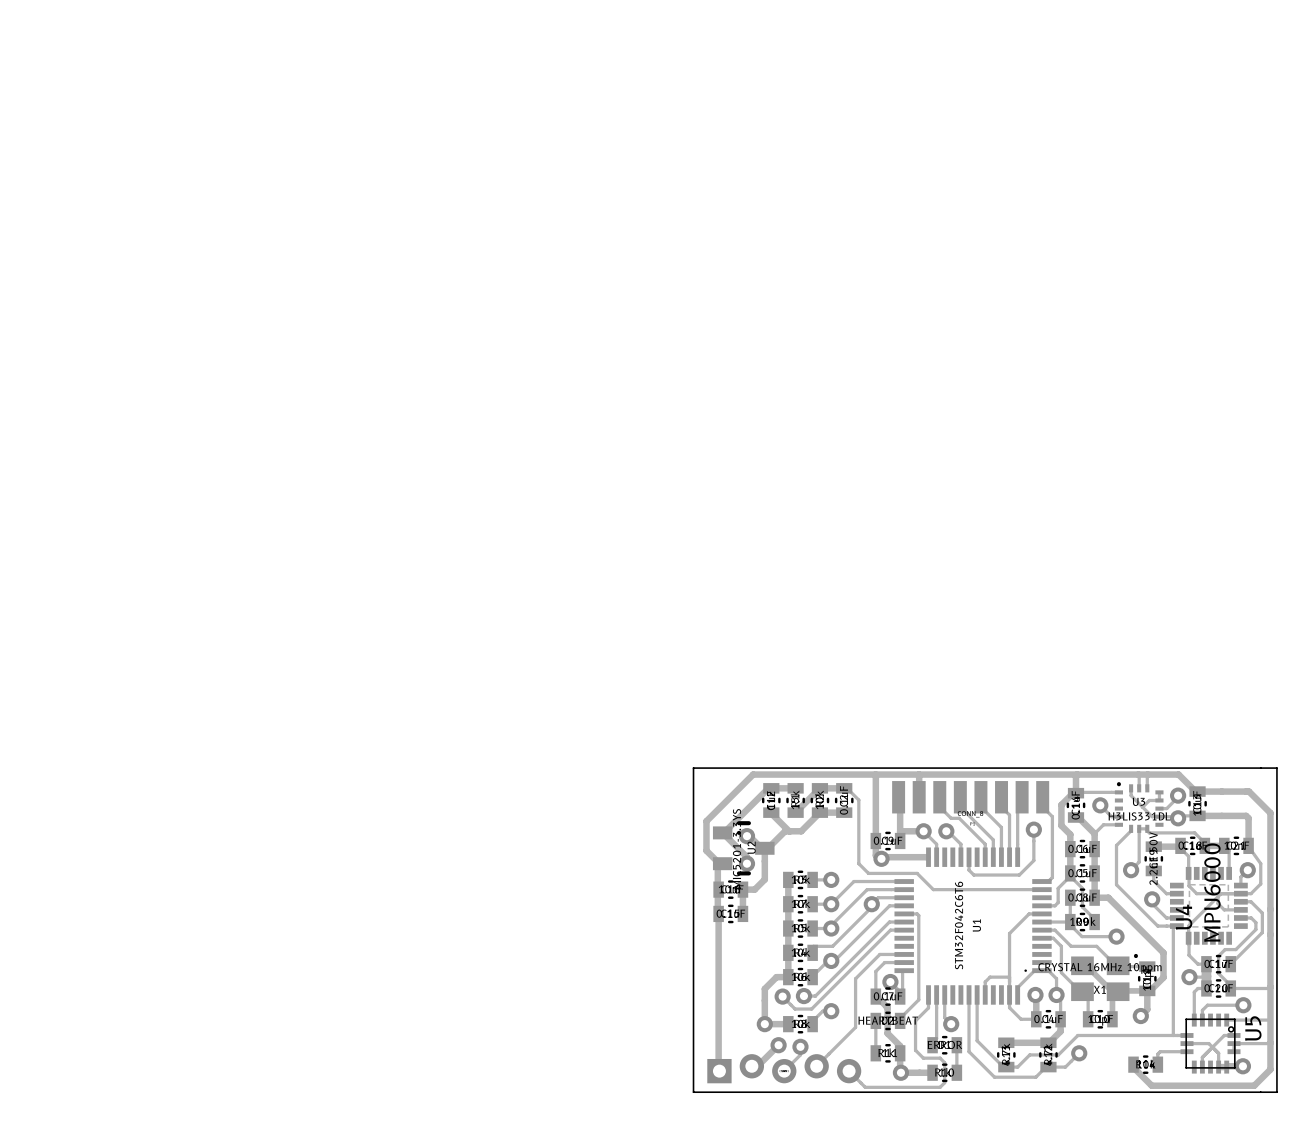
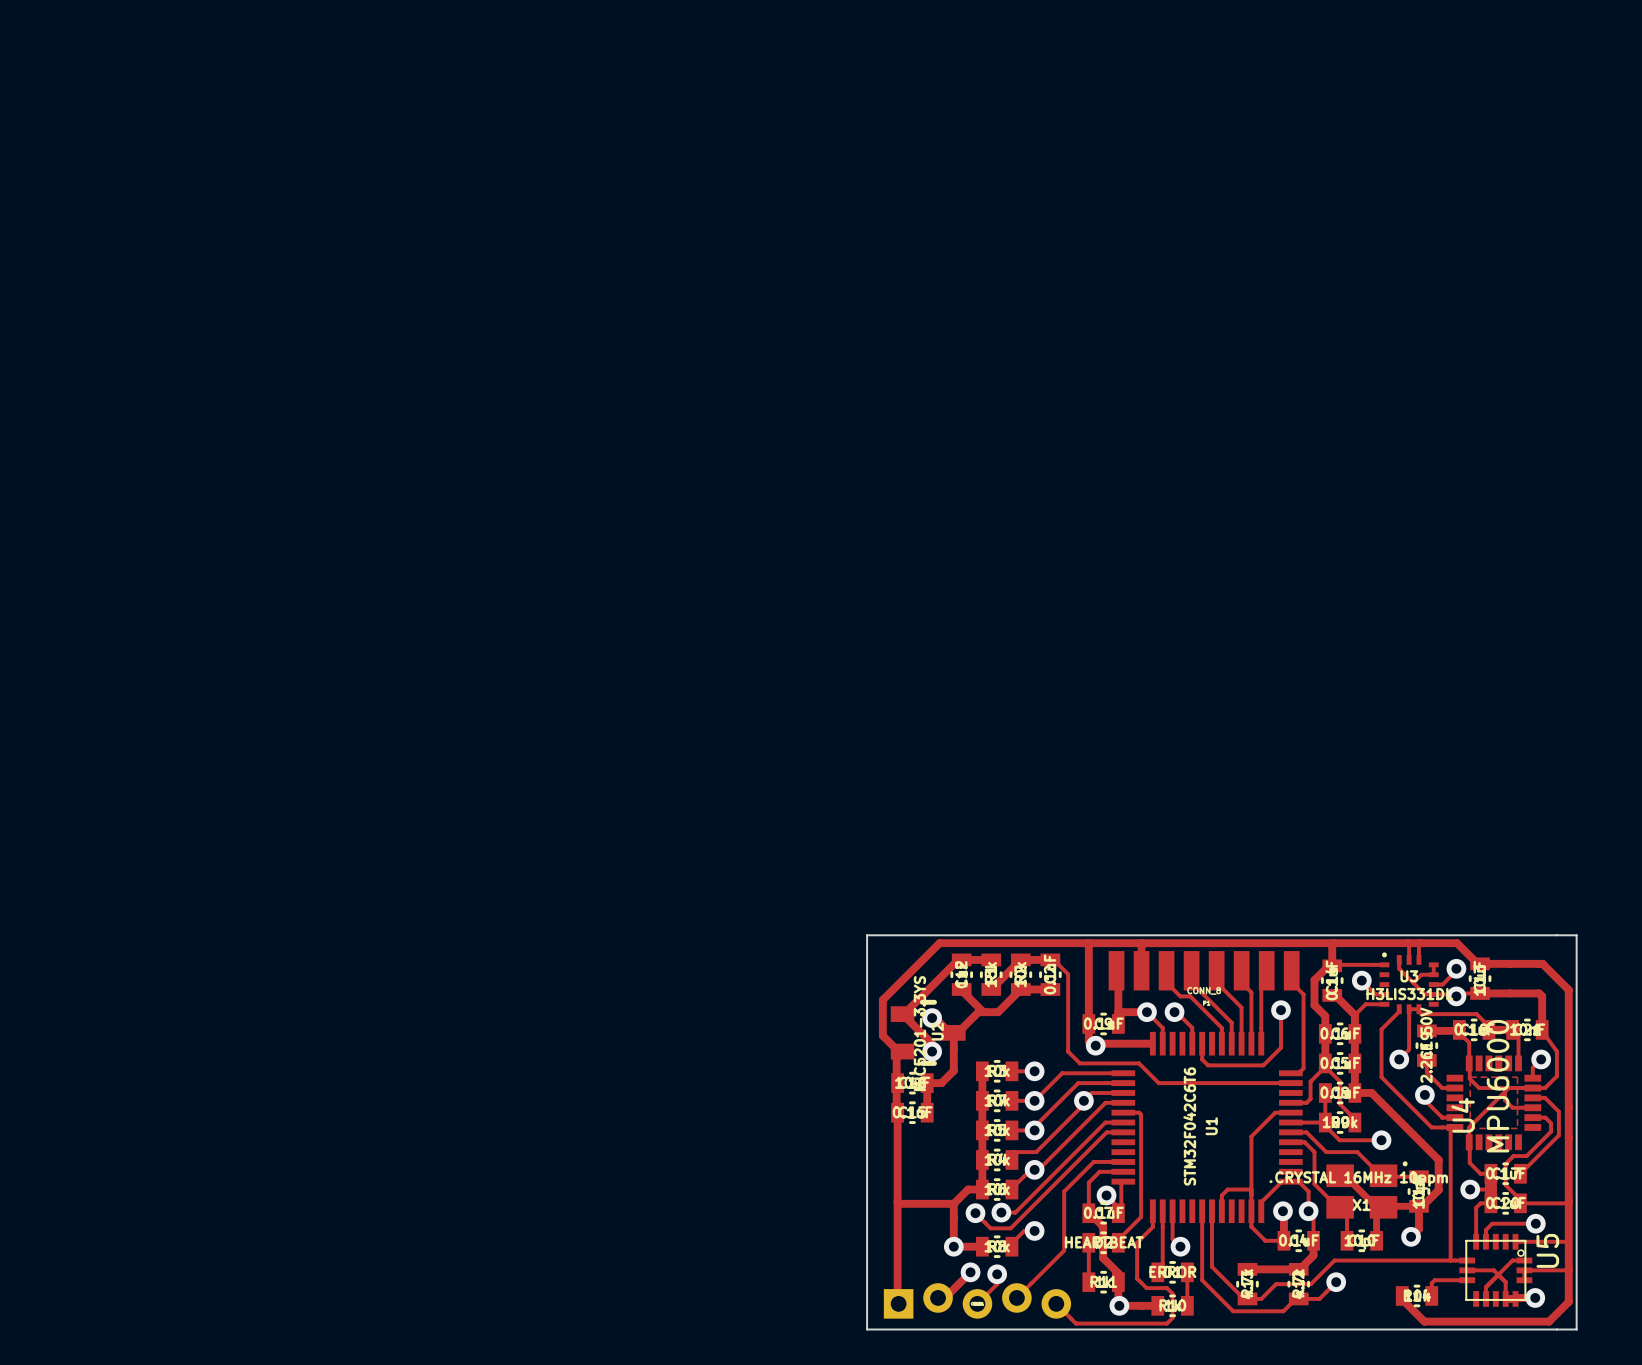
track: none -> (897, 1201) (899, 1203) (953, 1203)

